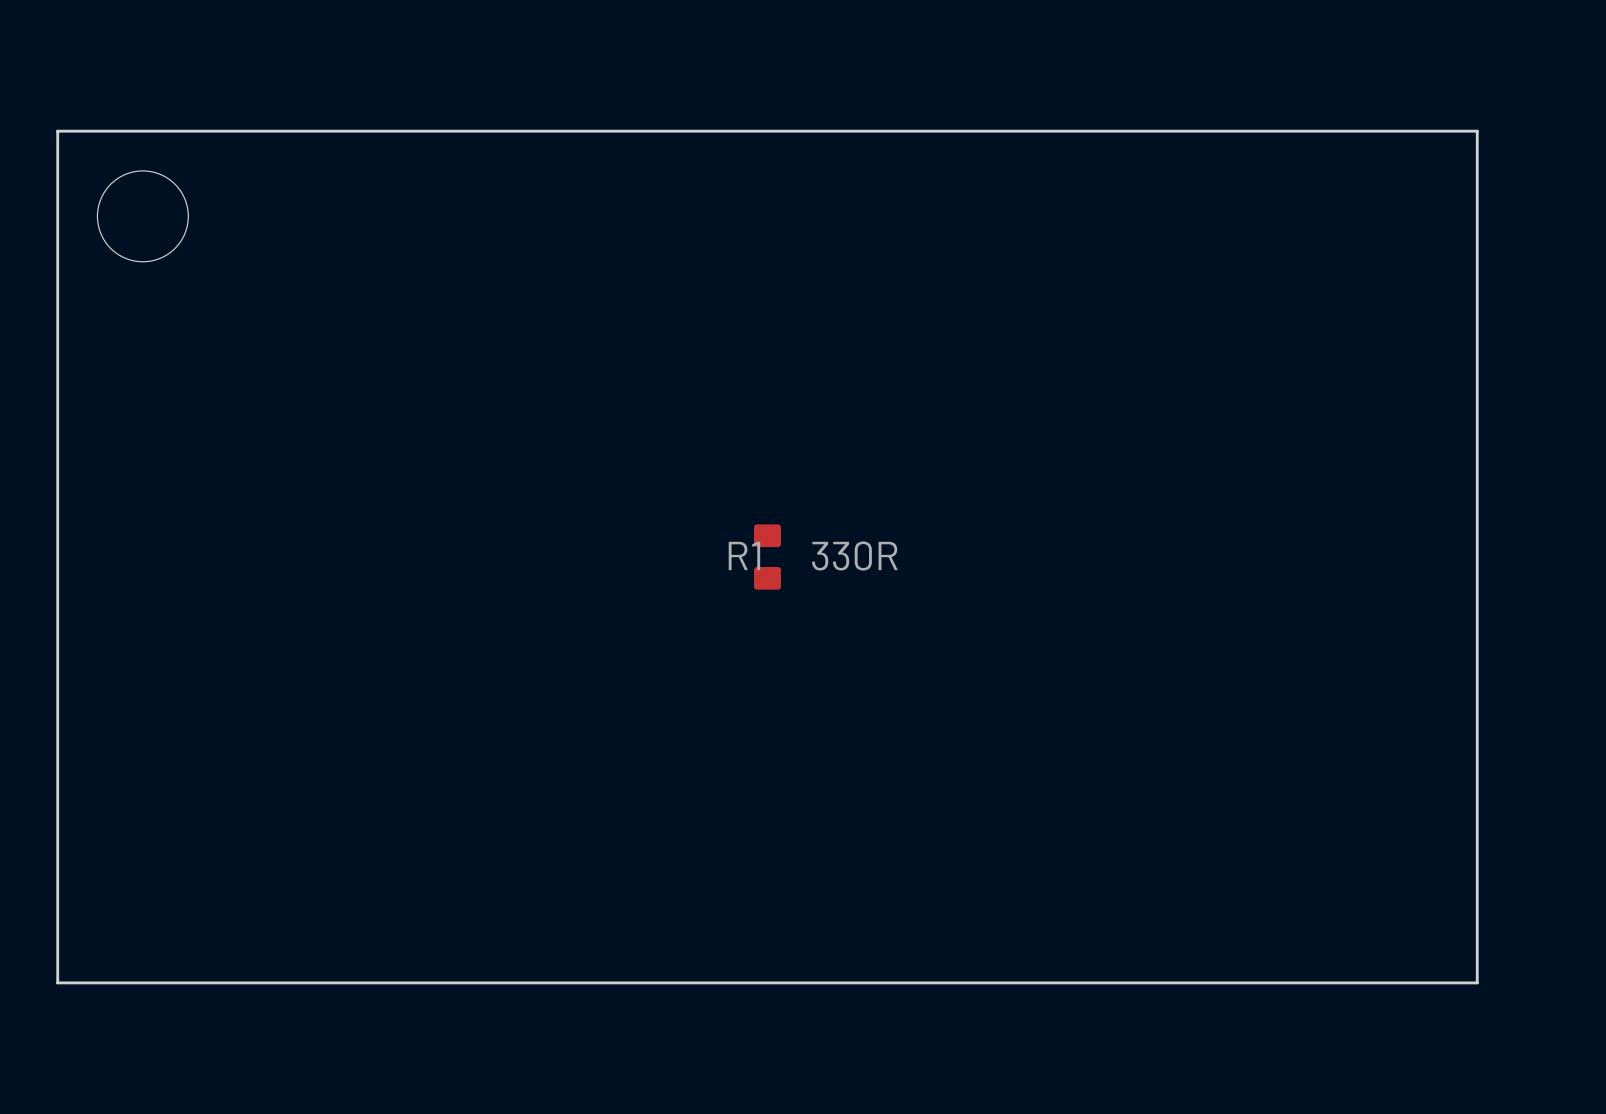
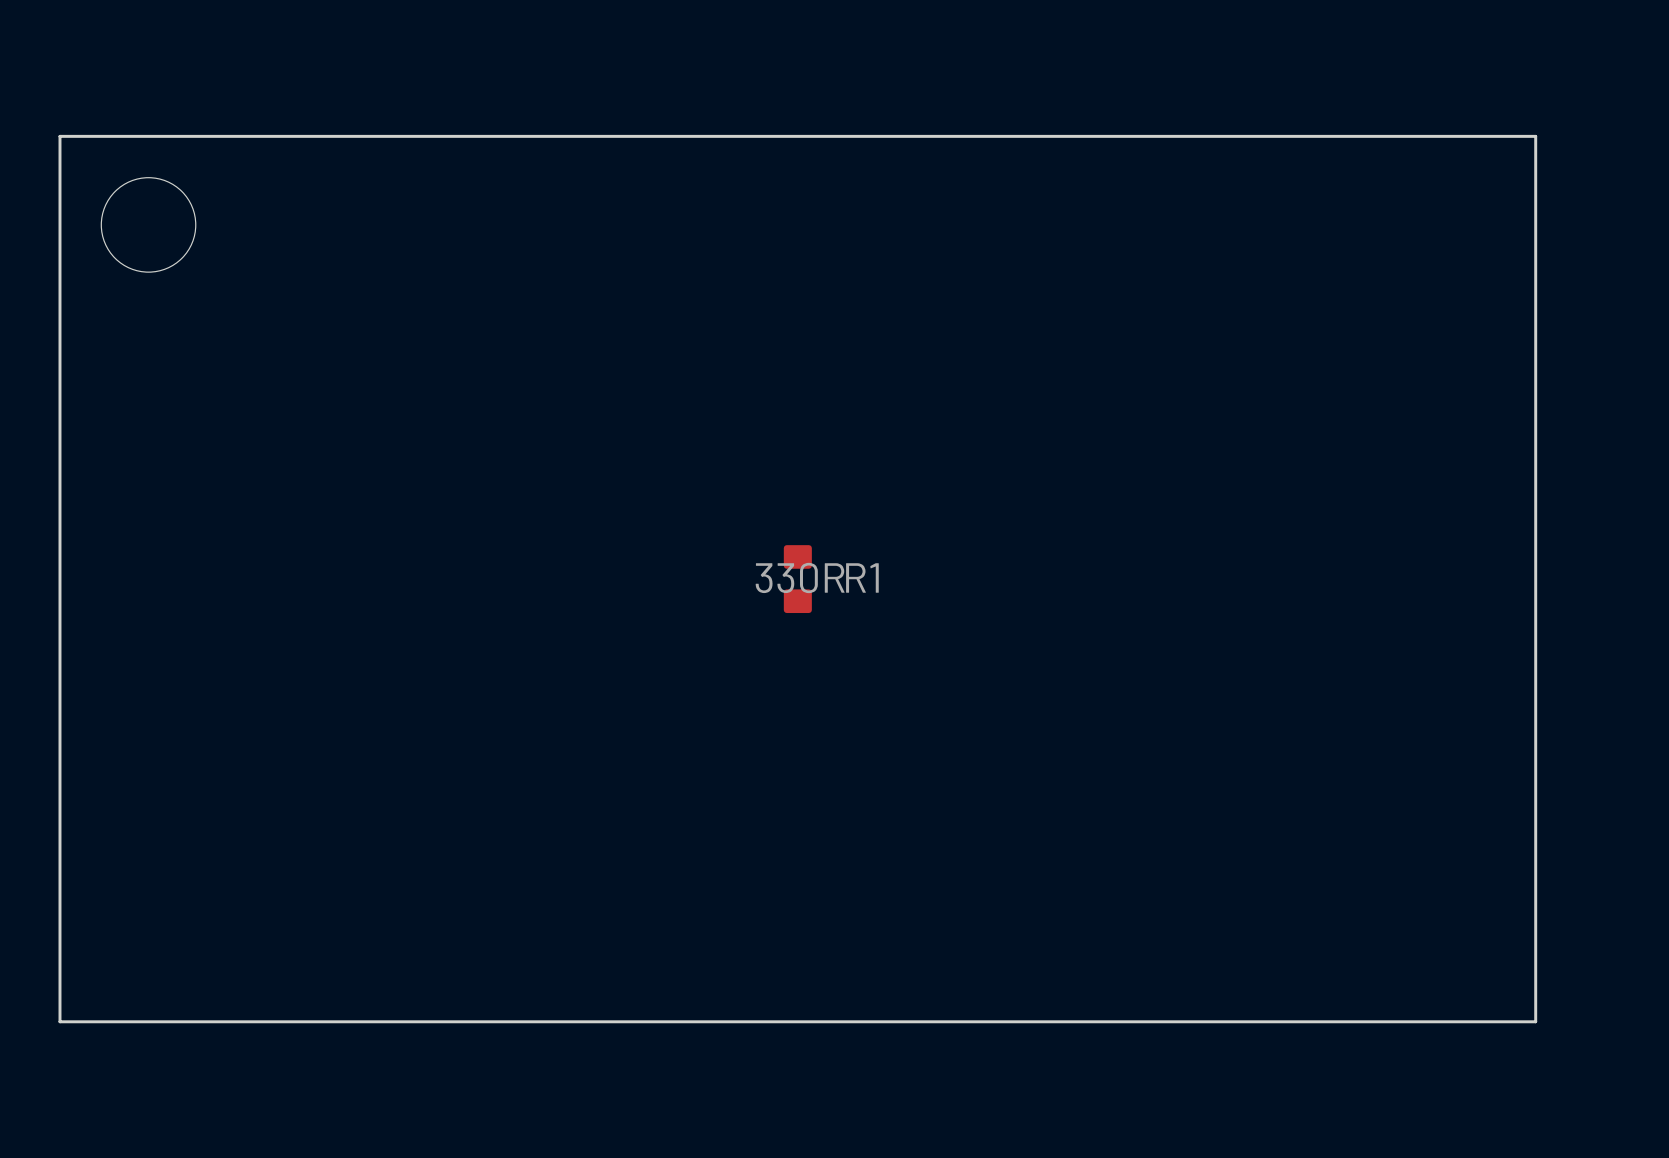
R1 name position: R1 (744, 555) -> R1 (862, 577)
R1 value position: 330R (854, 556) -> 330R (800, 577)

